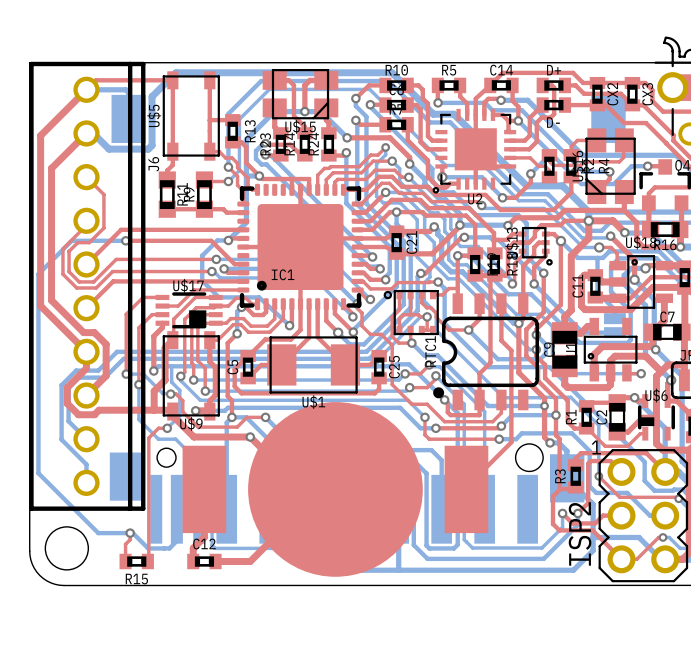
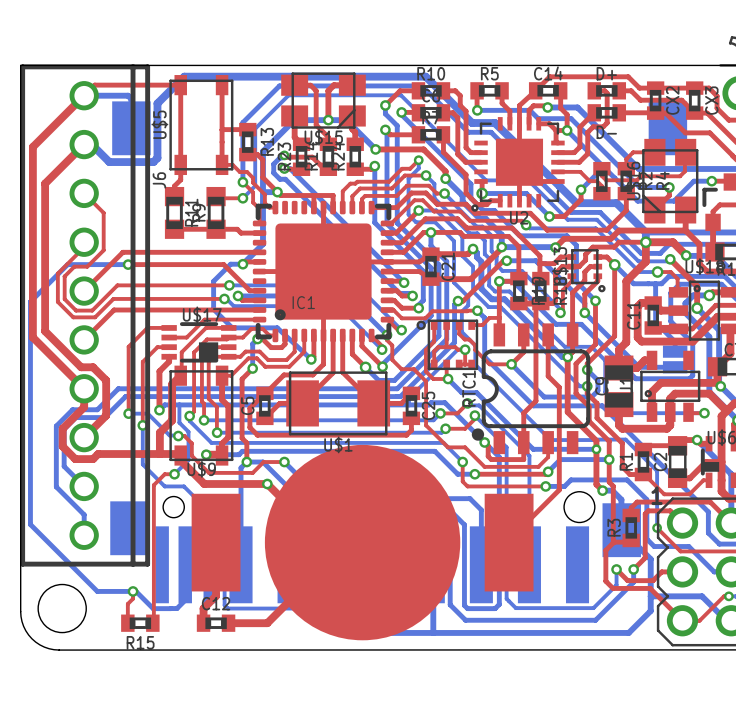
ISP2 name: ISP2 (580, 533) -> none

